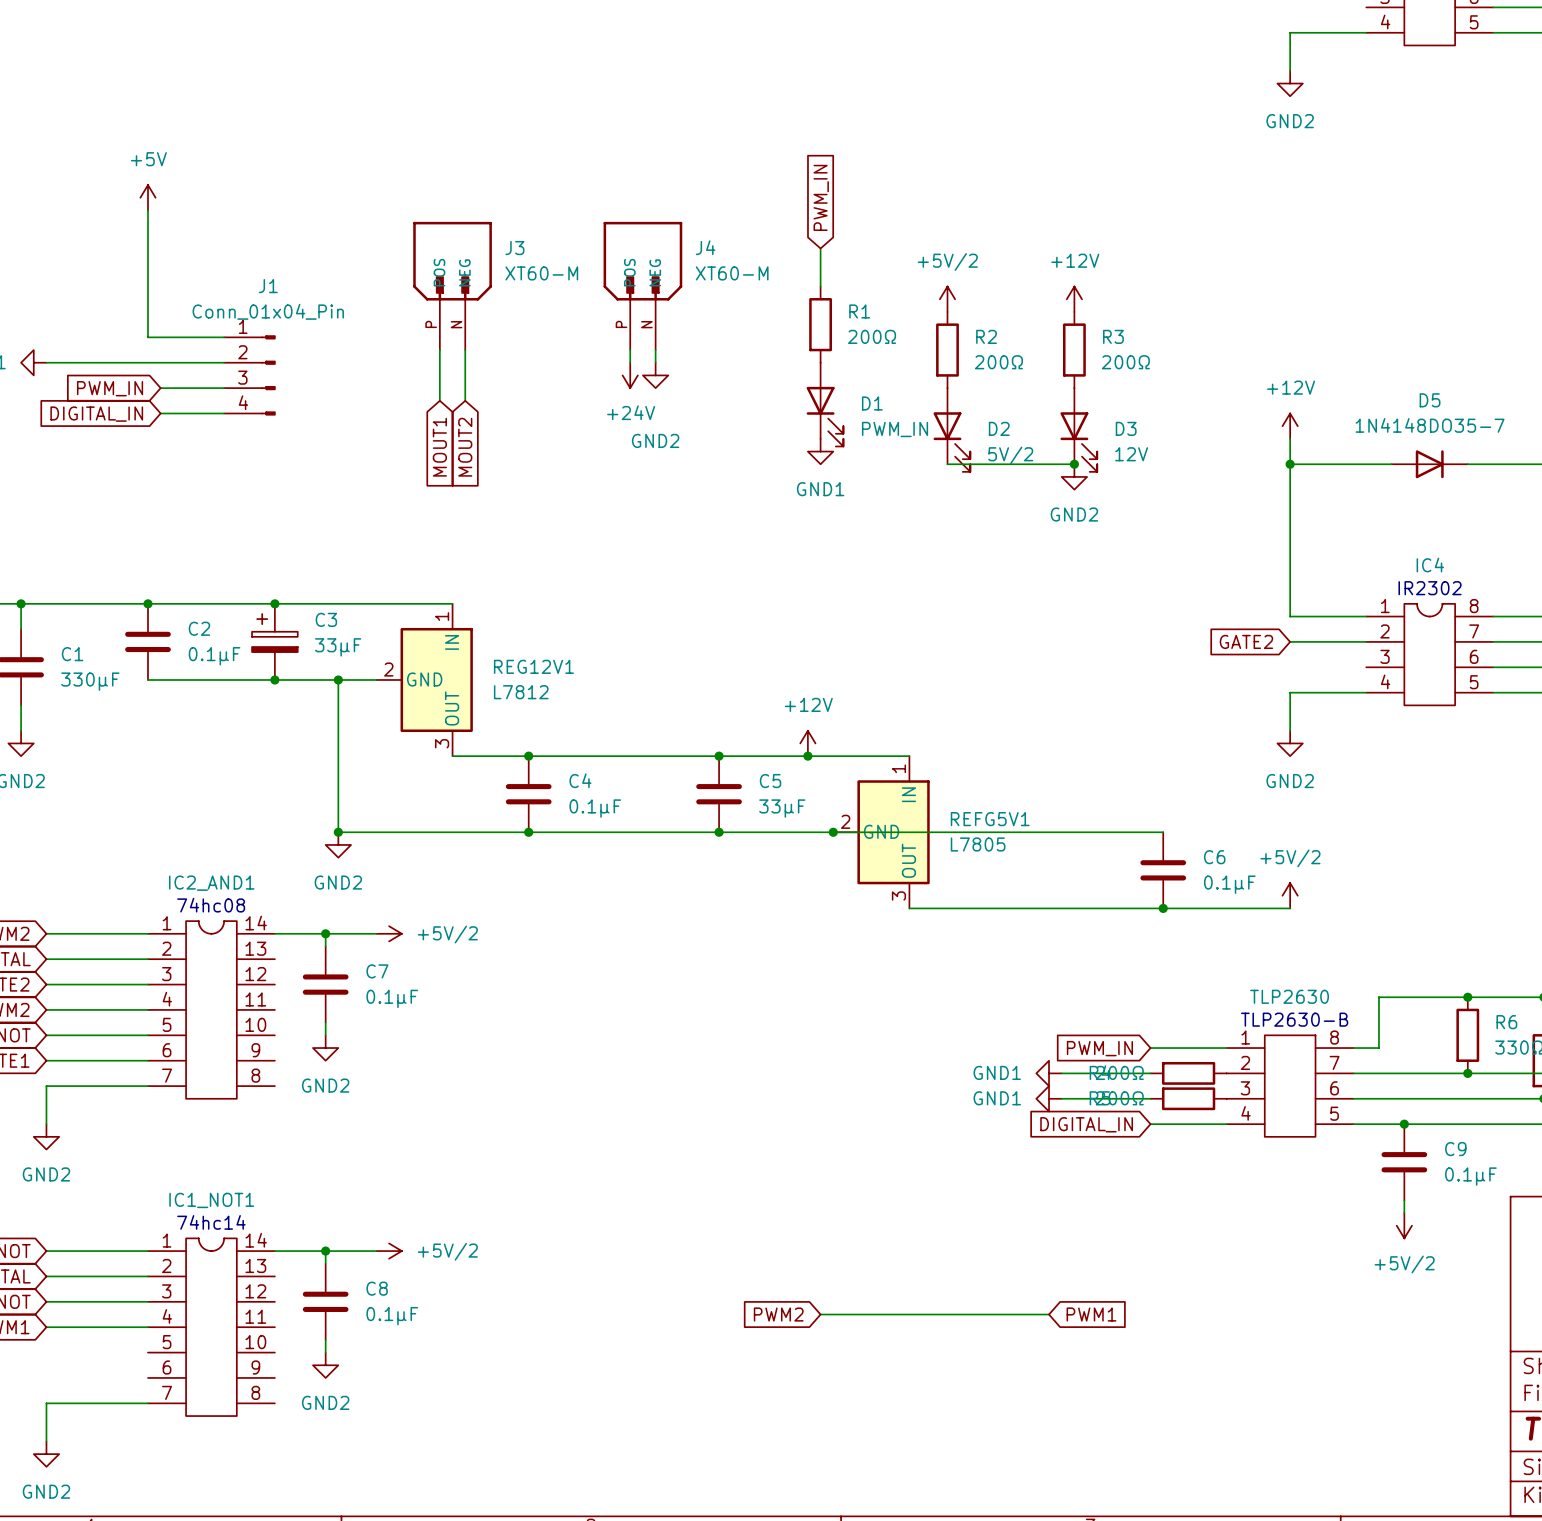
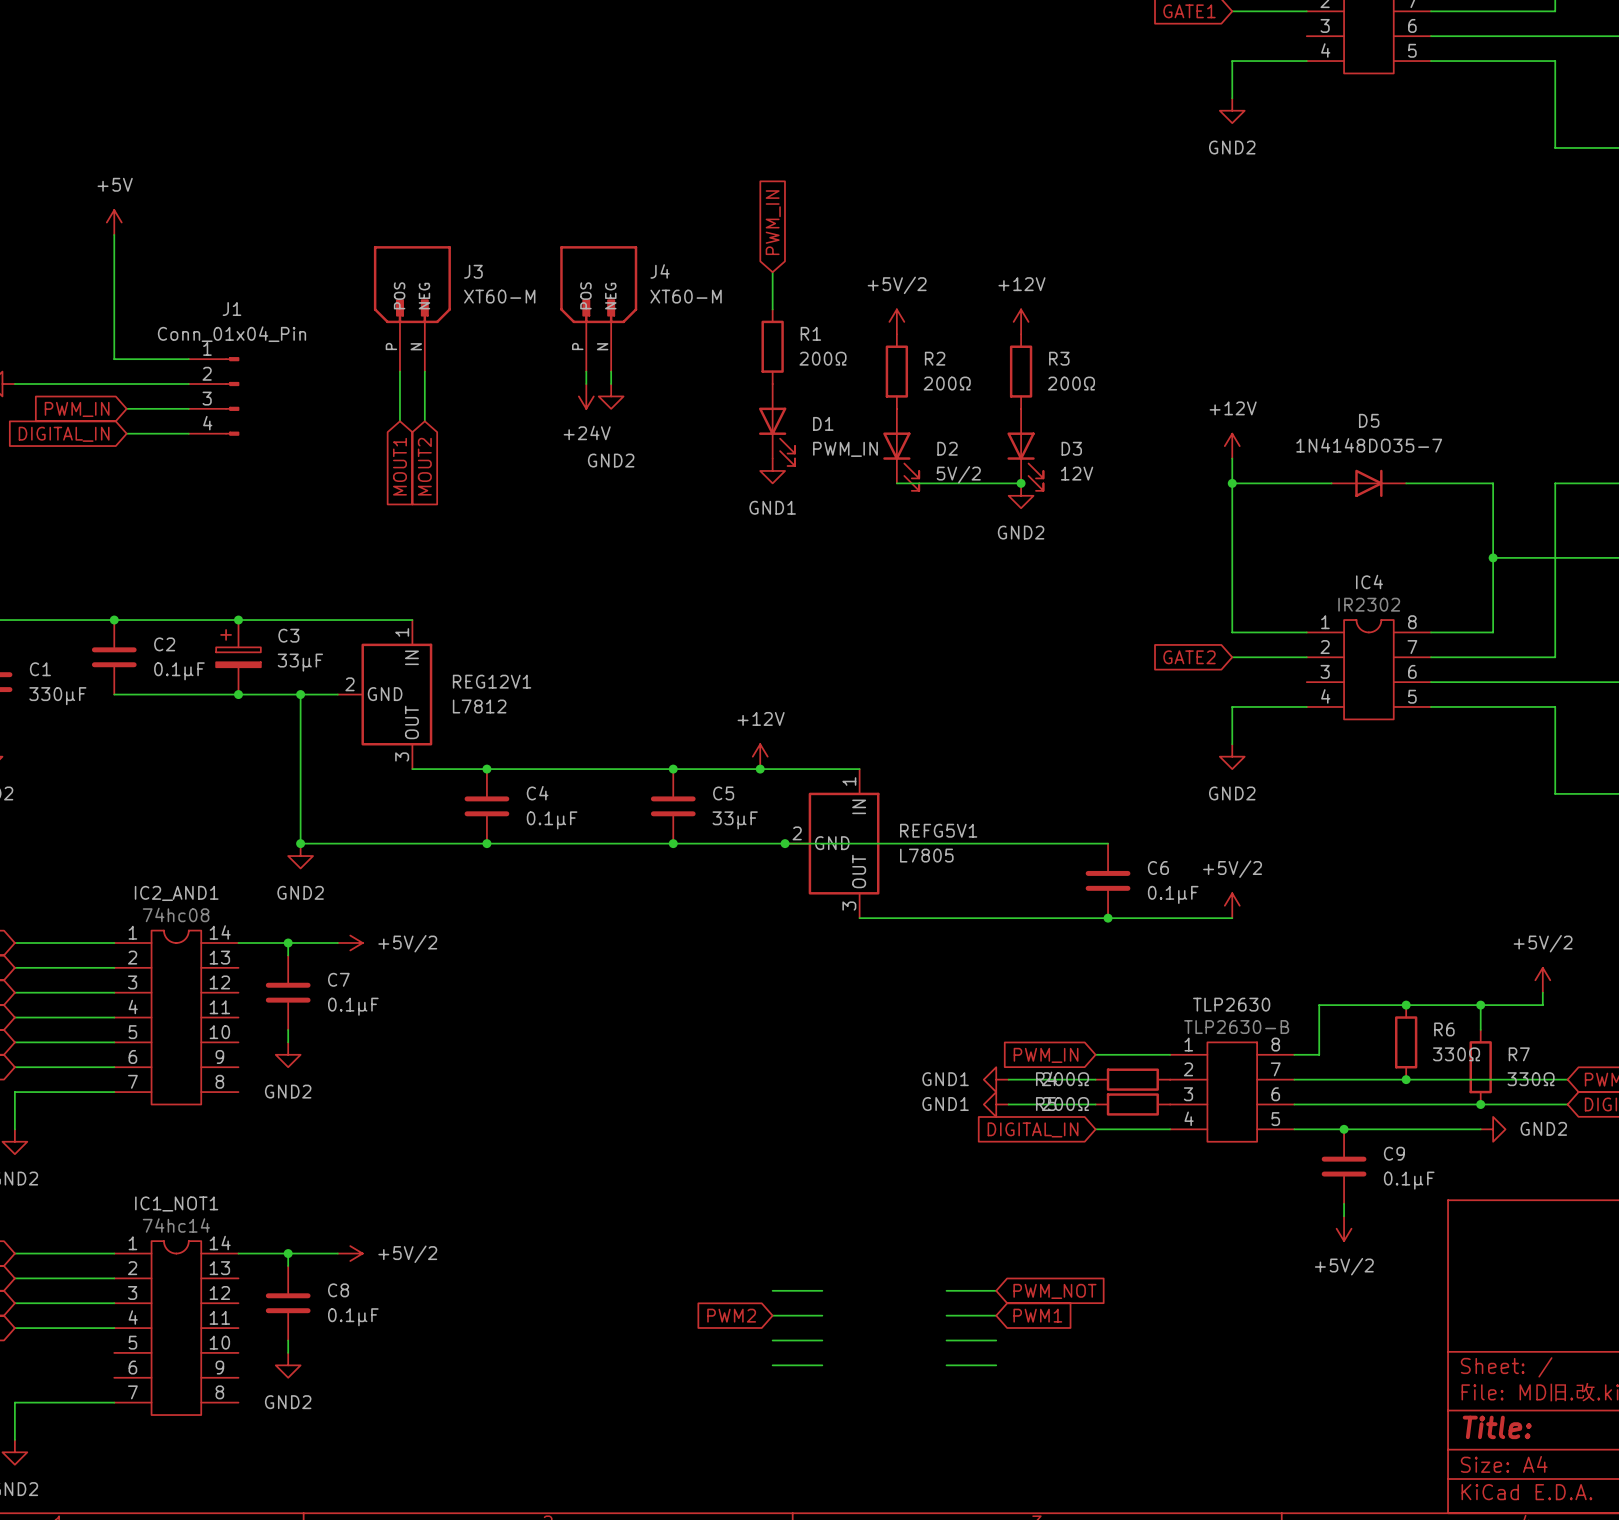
wire: none -> (772, 1290) (822, 1290)
wire: none -> (946, 1290) (996, 1290)
global label: none -> PWM_NOT (1054, 1291)
wire: (871, 1314) (998, 1314) -> none
wire: none -> (772, 1340) (822, 1340)
wire: none -> (946, 1340) (996, 1340)
wire: none -> (772, 1365) (822, 1365)
wire: none -> (946, 1365) (996, 1365)

